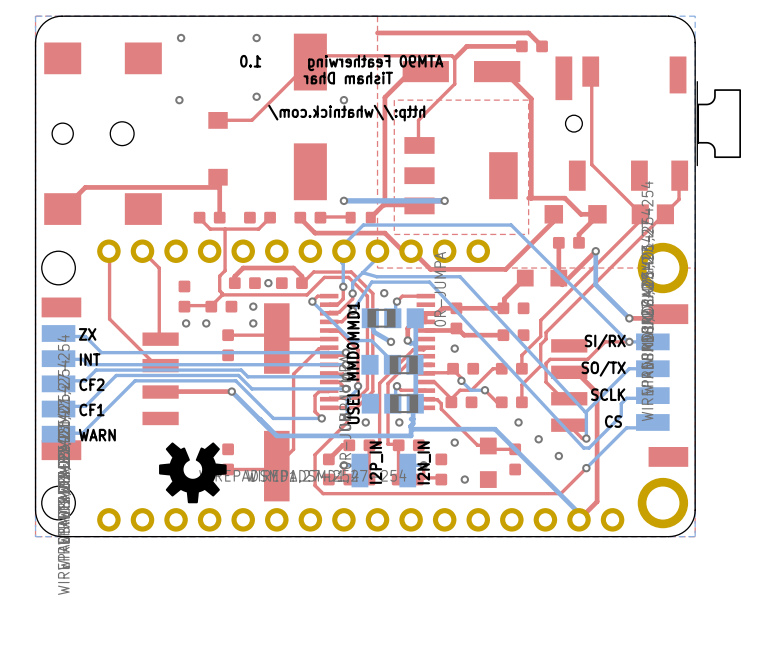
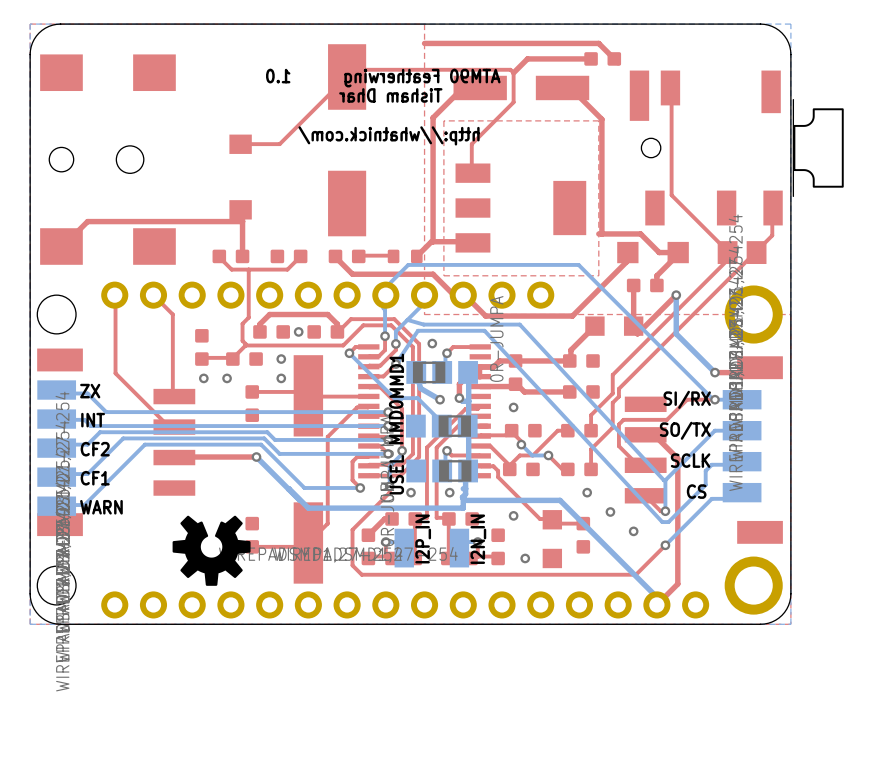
via: (181, 38) -> none
via: (256, 38) -> none
via: (256, 96) -> none
via: (179, 100) -> none
via: (343, 100) -> none
via: (343, 200) -> none
bottom track: (444, 200) (343, 200) -> none
via: (444, 200) -> none

